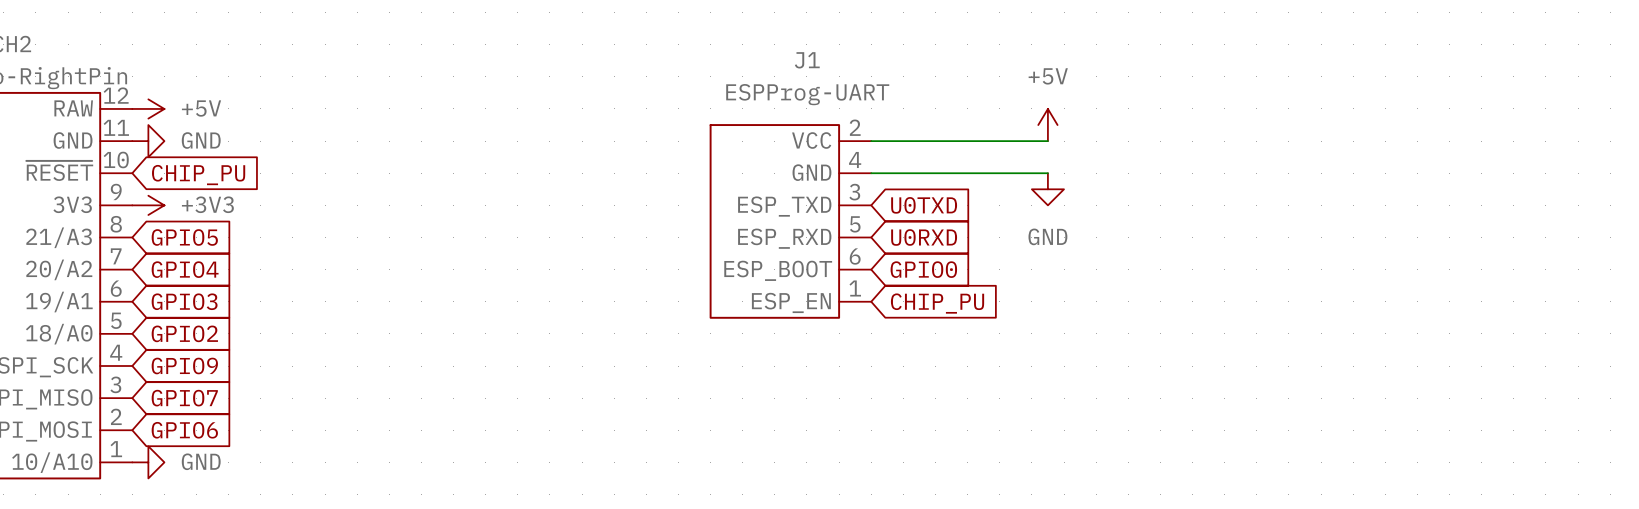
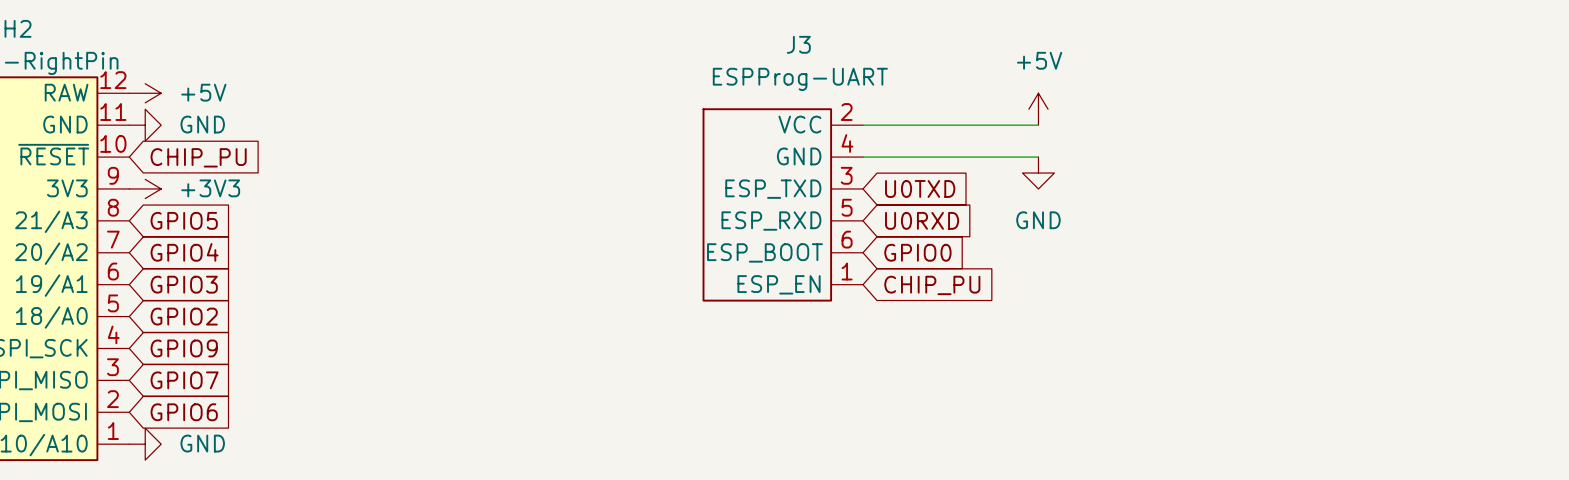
J1 name: J1 (807, 60) -> J3 (798, 44)

